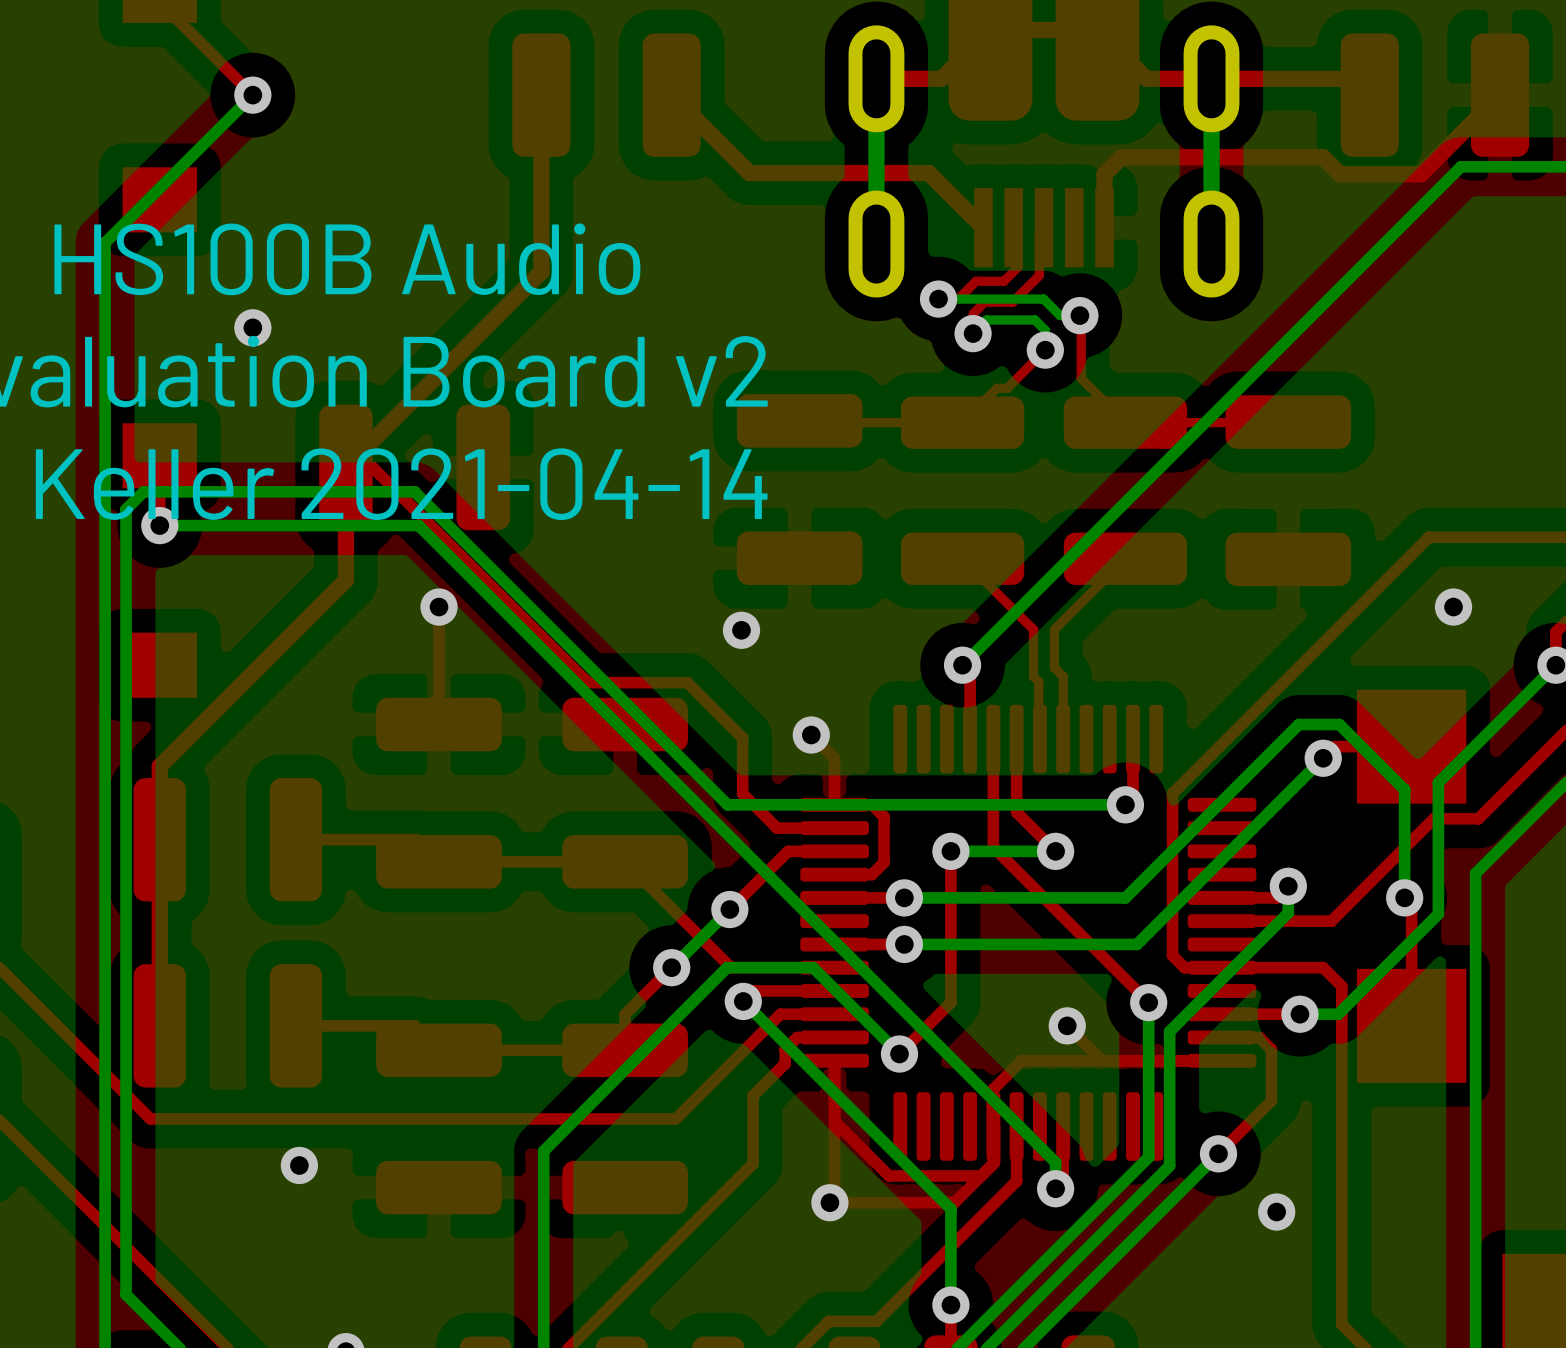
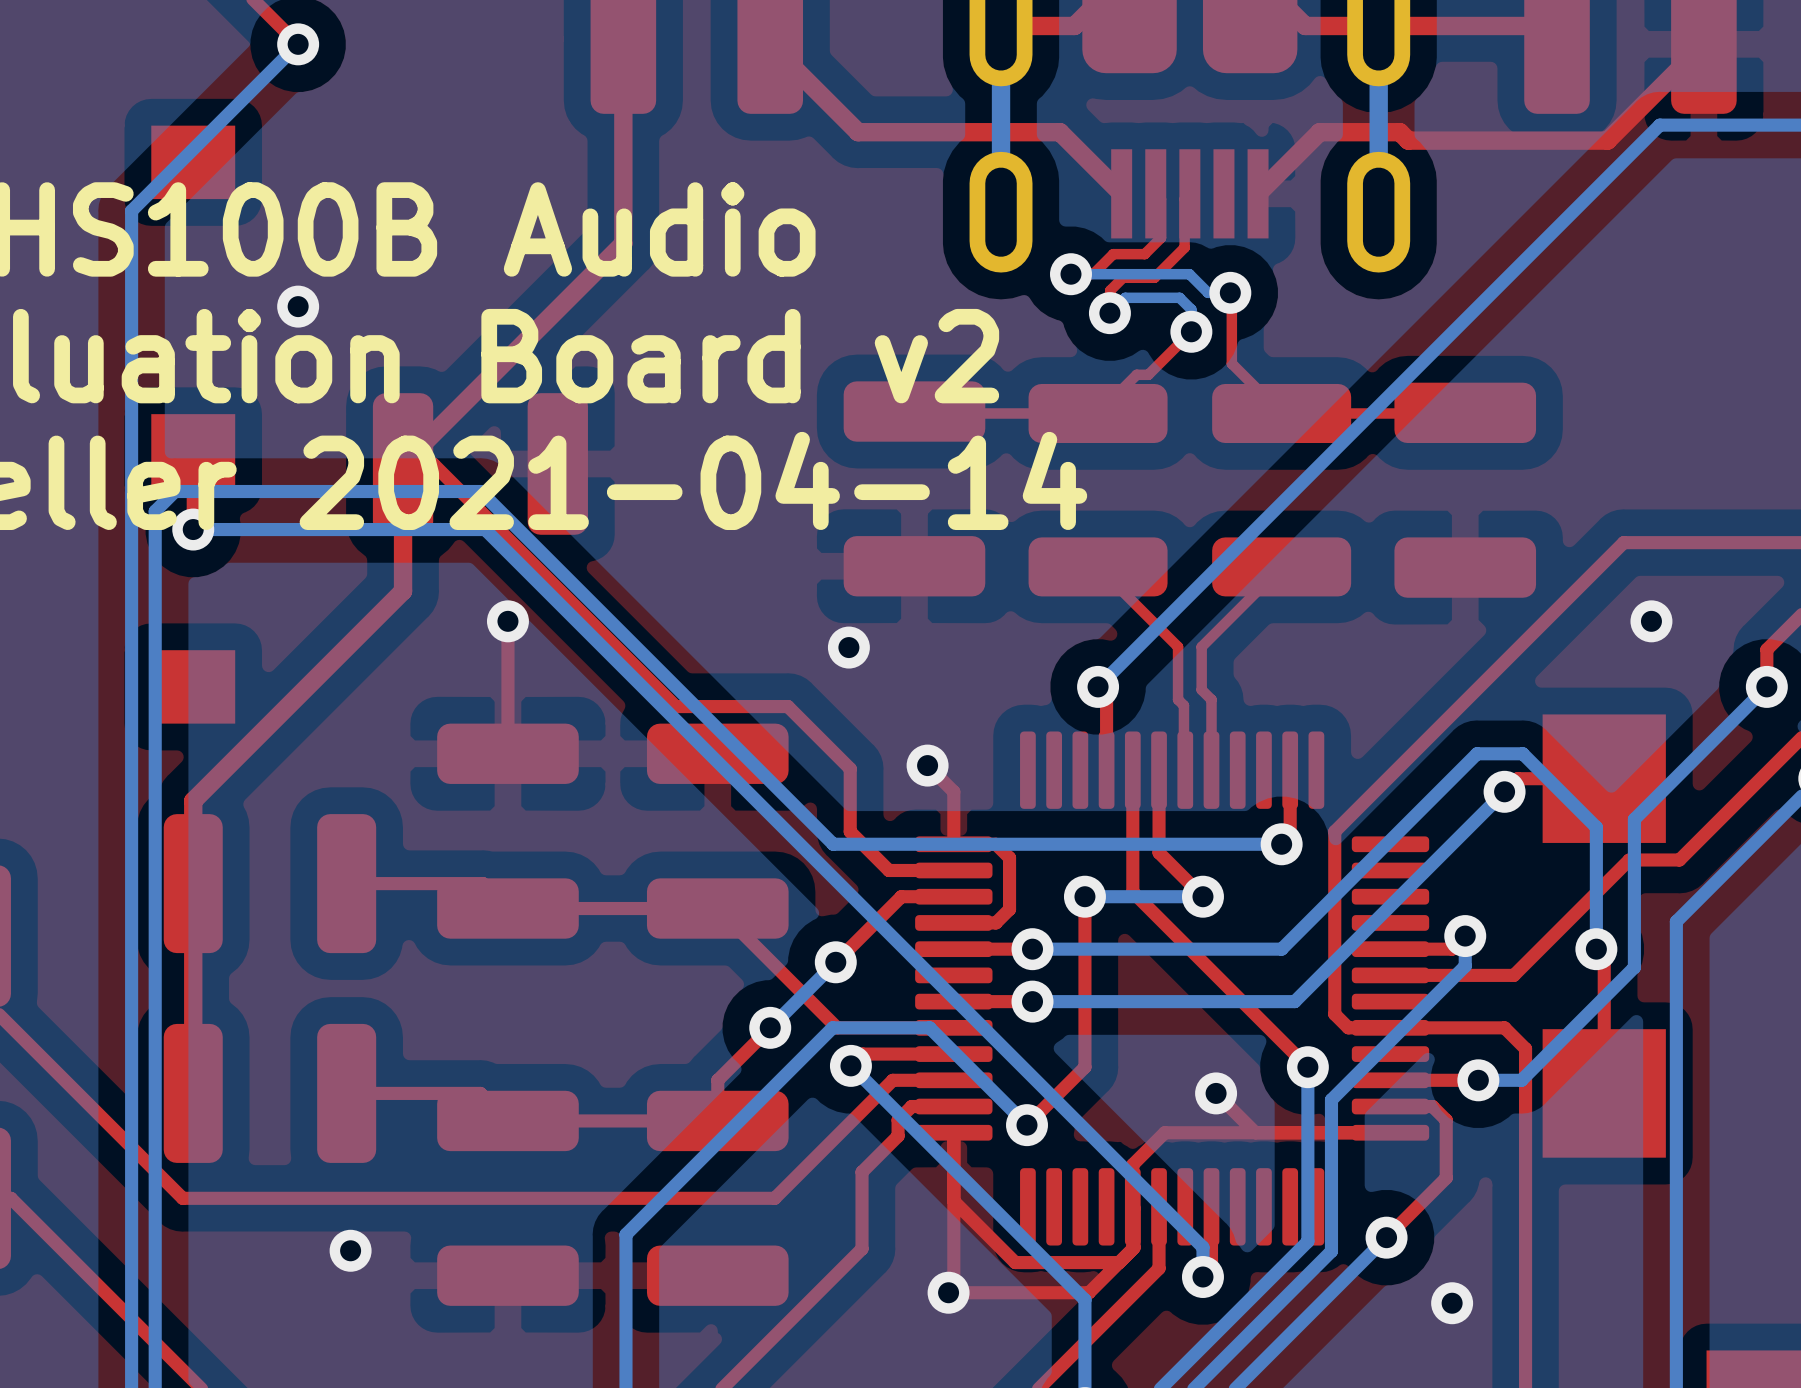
top track: (1420, 174) (1340, 174) (1323, 157) (1121, 157) (1104, 174) (1104, 227) -> (1614, 133) (1607, 140) (1408, 140) (1399, 132) (1319, 132) (1258, 193)

